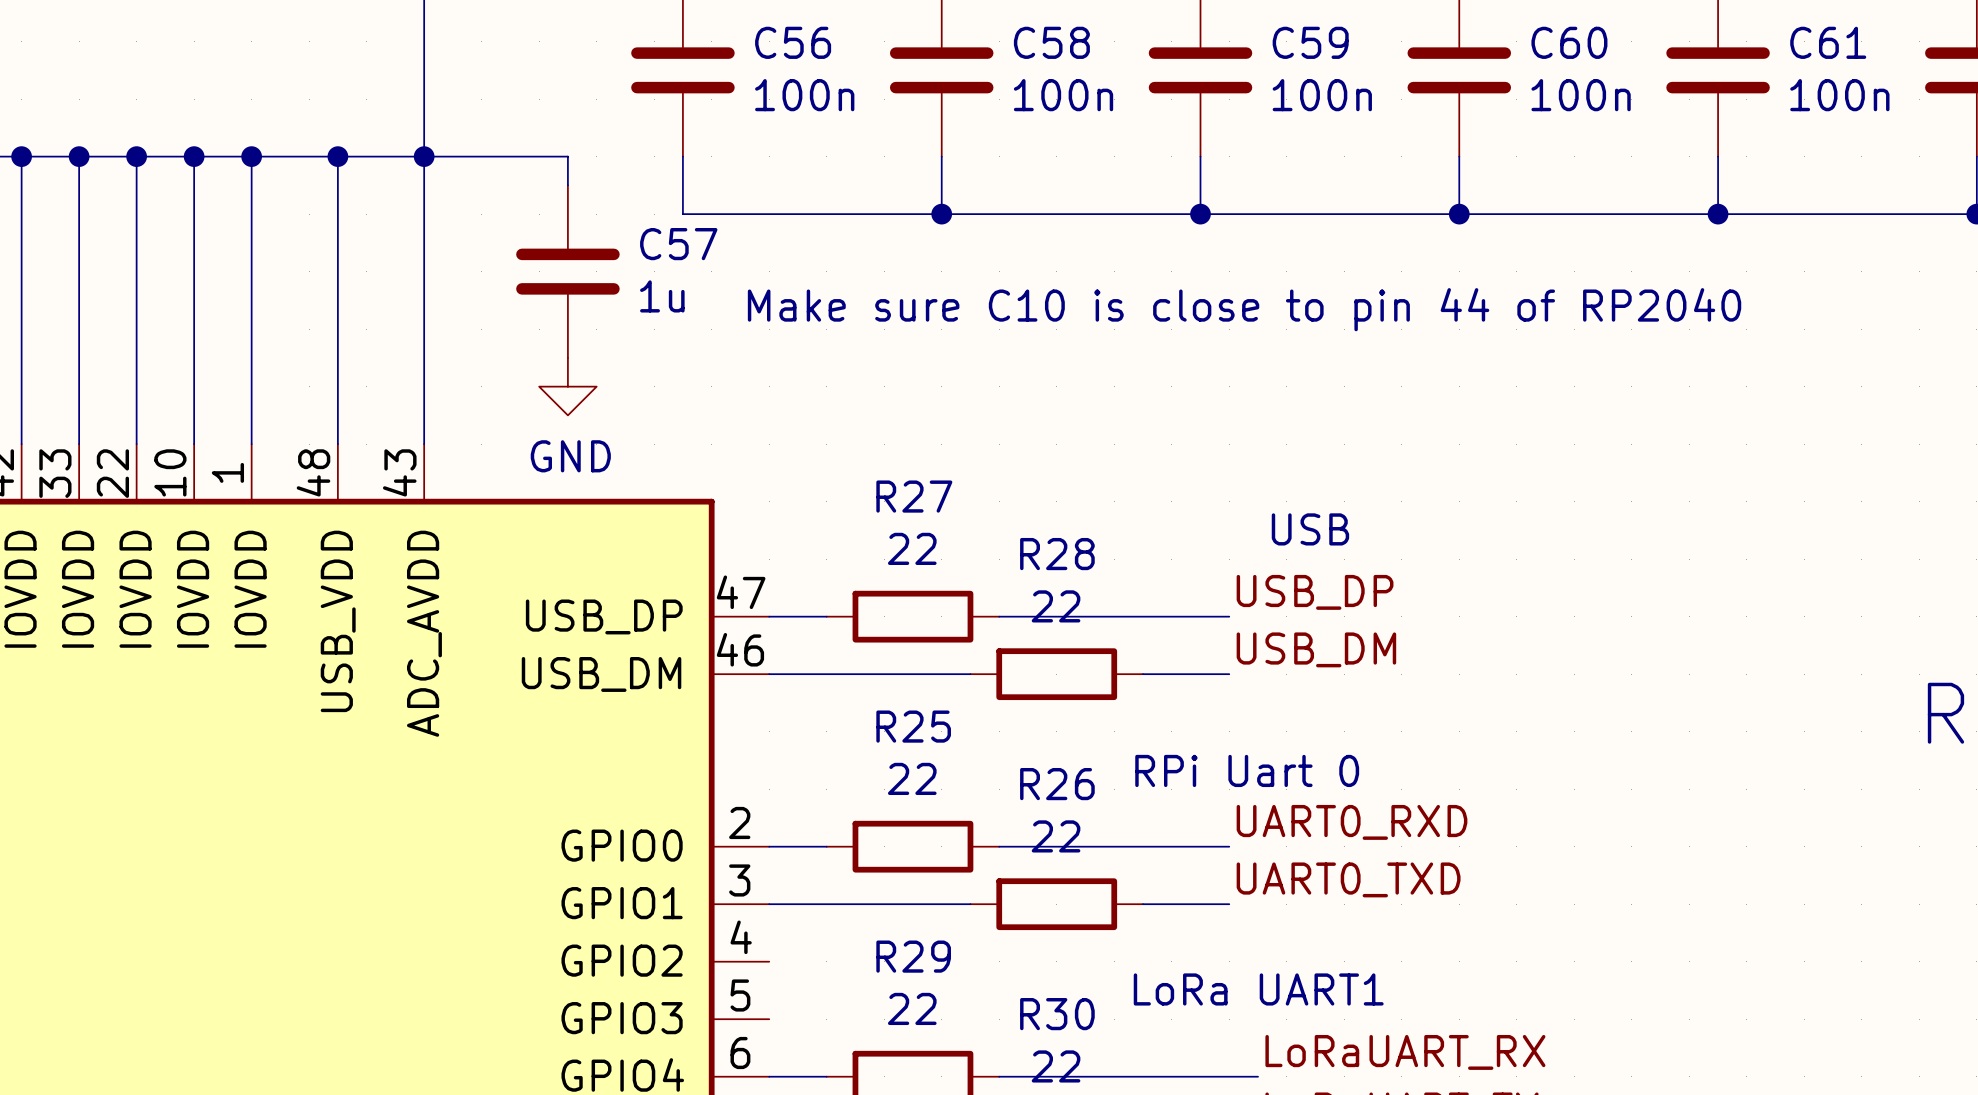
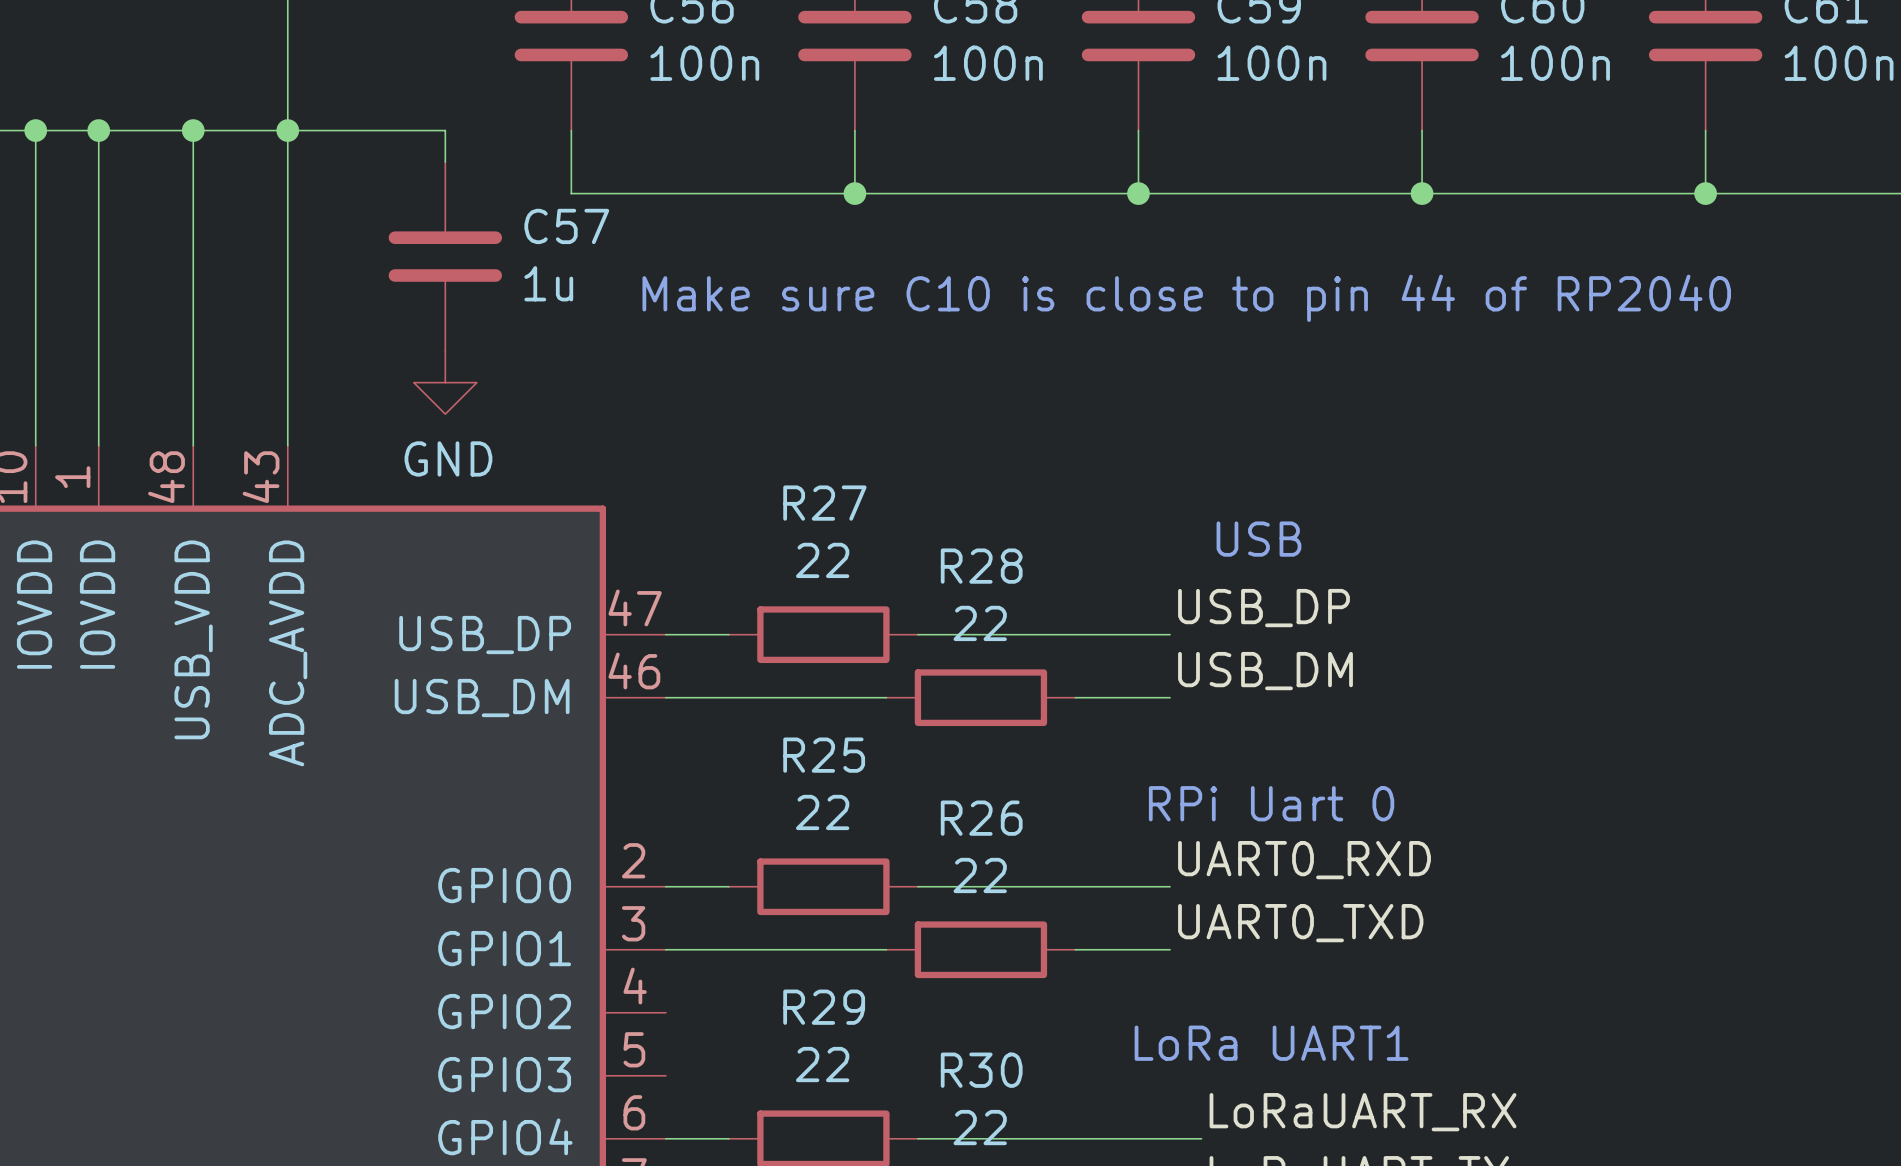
text position: RPi Uart 0 (1247, 770) -> RPi Uart 0 (1271, 803)
text position: LoRa UART1 (1258, 989) -> LoRa UART1 (1271, 1043)

